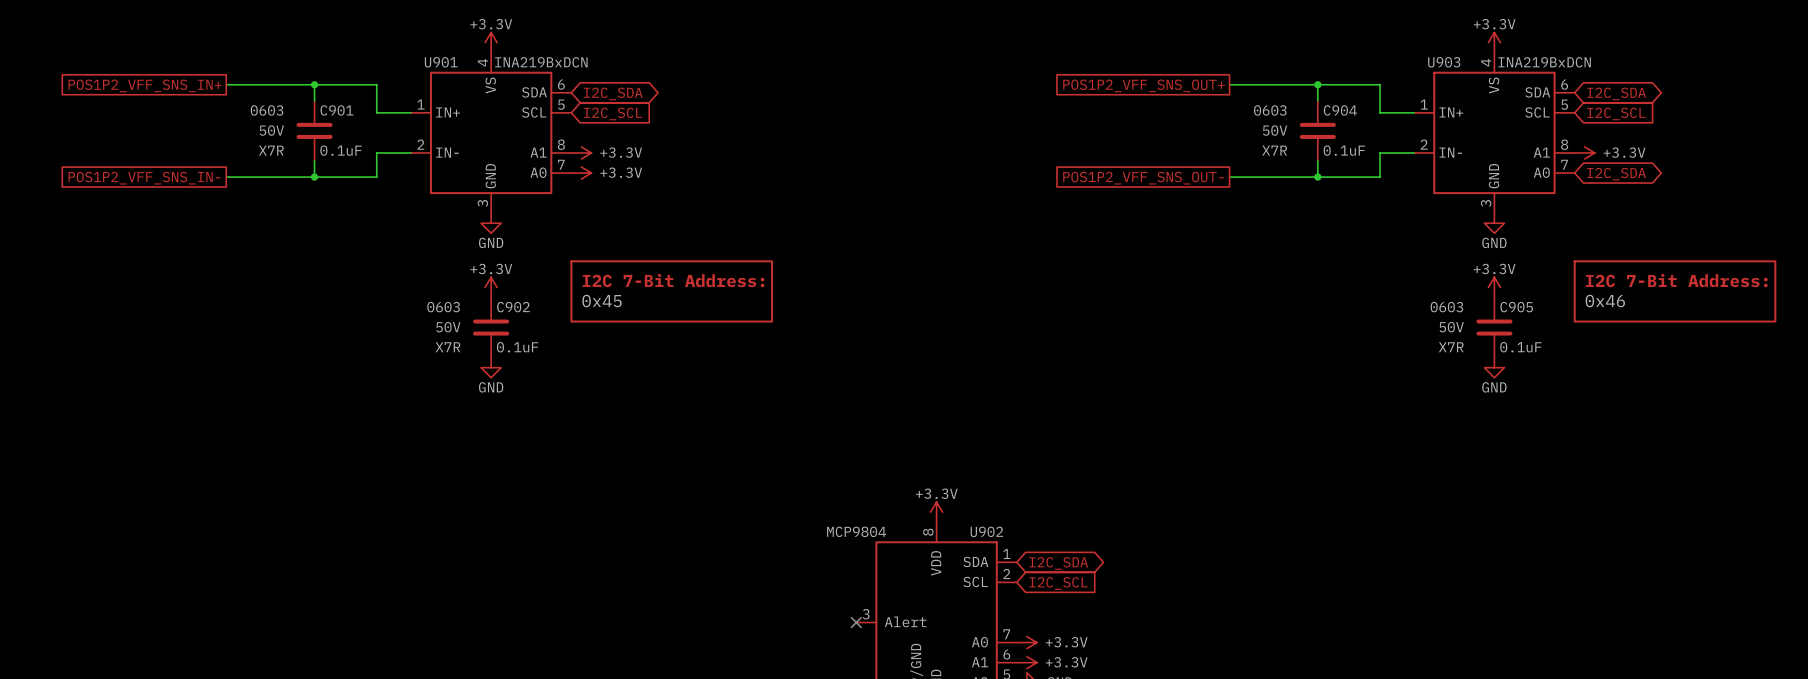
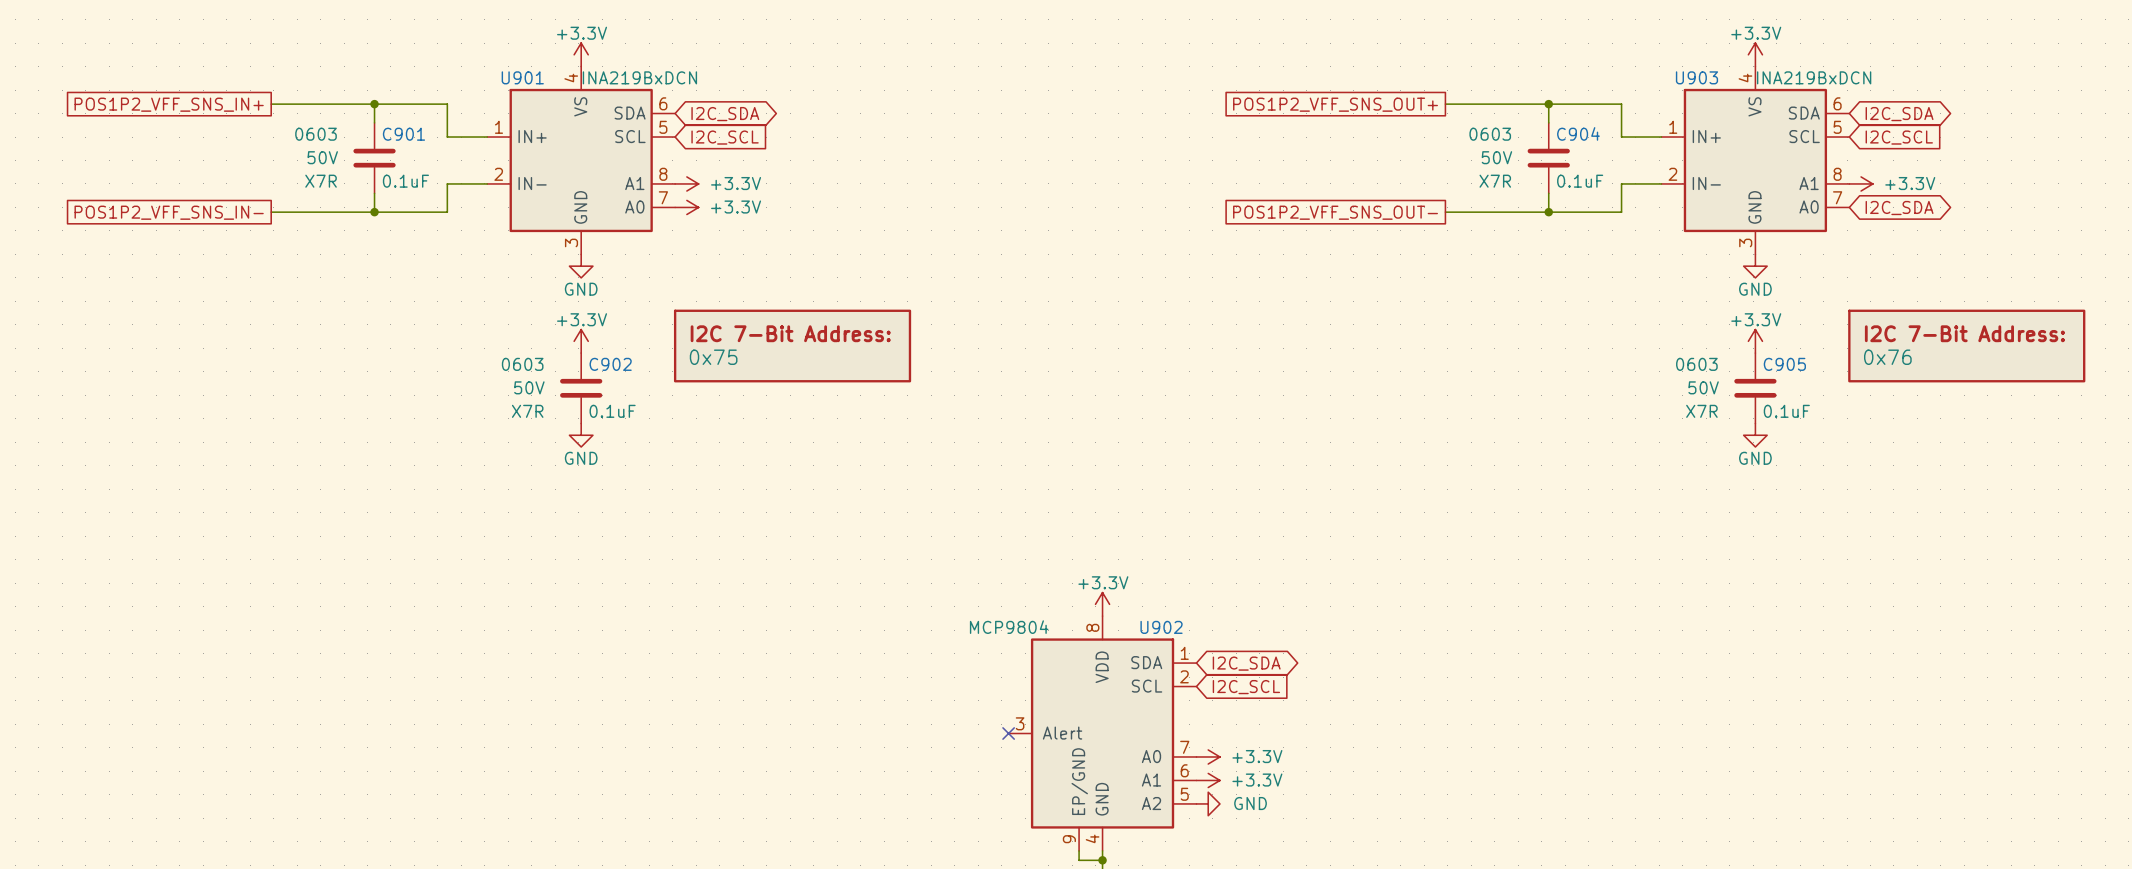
part value: 0x45 (602, 301) -> 0x75 (713, 357)
part value: 0x46 (1605, 301) -> 0x76 (1887, 357)

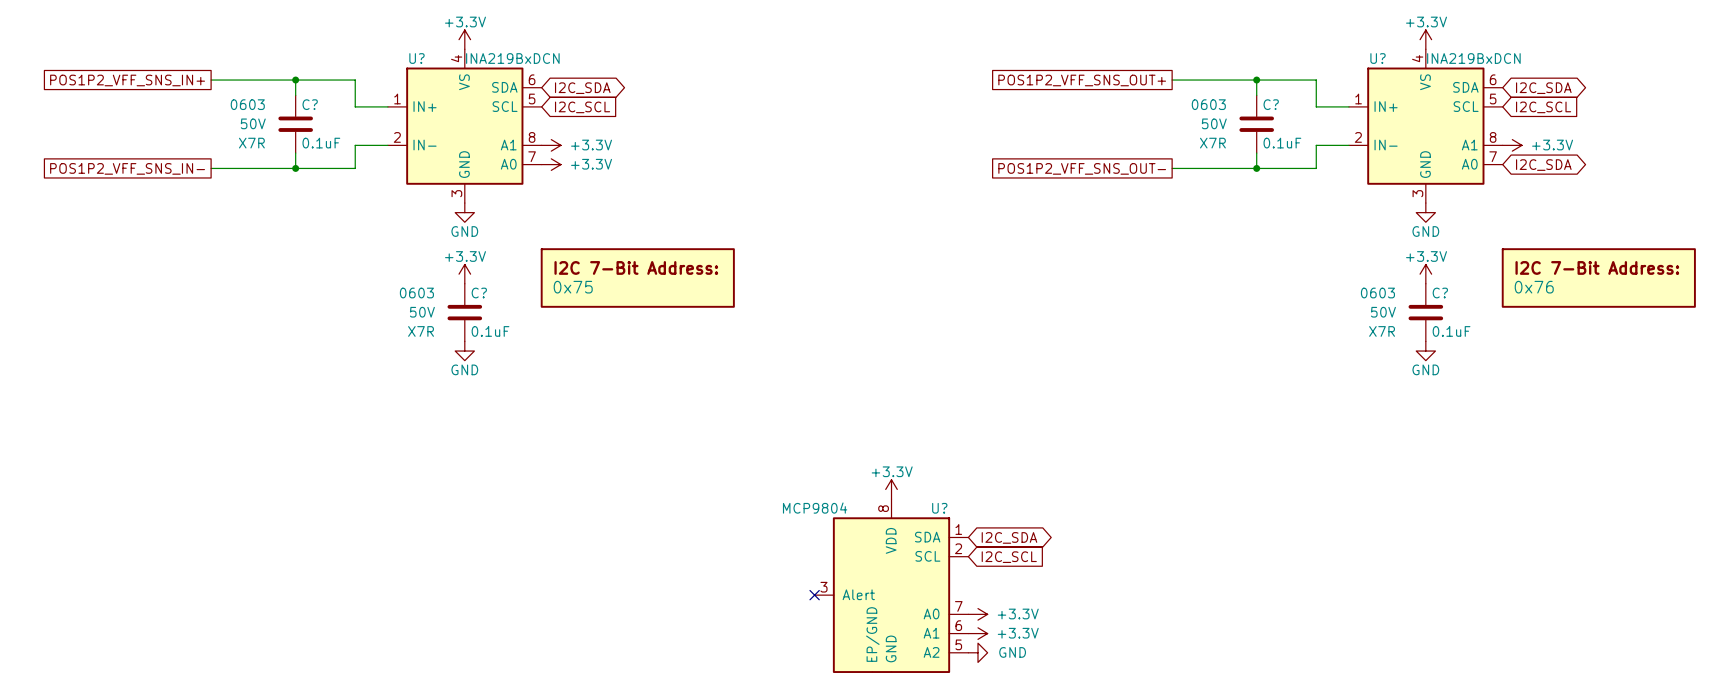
U901 name: U901 (522, 77) -> U? (416, 58)
U903 name: U903 (1696, 77) -> U? (1378, 58)
C904 name: C904 (1578, 133) -> C? (1271, 104)
C901 name: C901 (403, 134) -> C? (310, 104)
C902 name: C902 (610, 364) -> C? (479, 293)
C905 name: C905 (1784, 364) -> C? (1440, 293)
U902 name: U902 (1161, 627) -> U? (939, 508)

